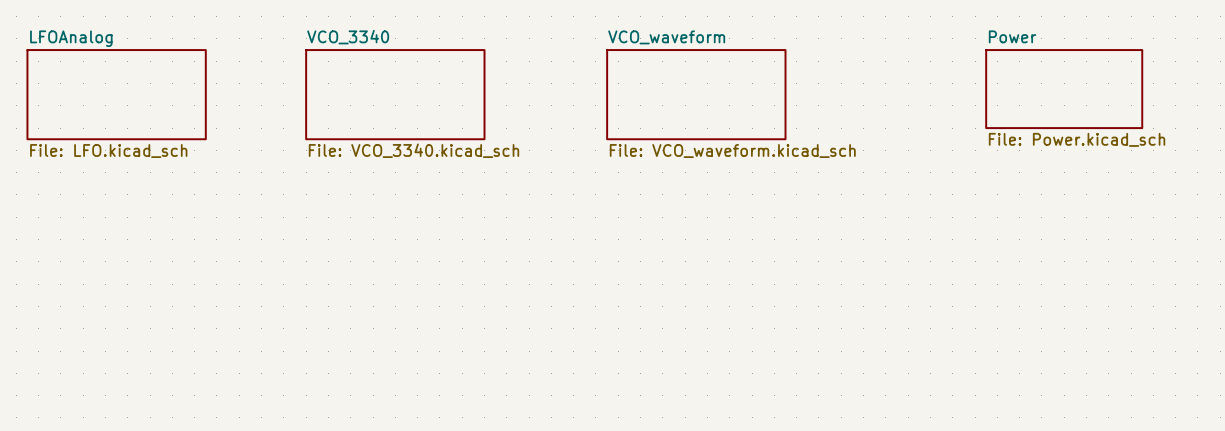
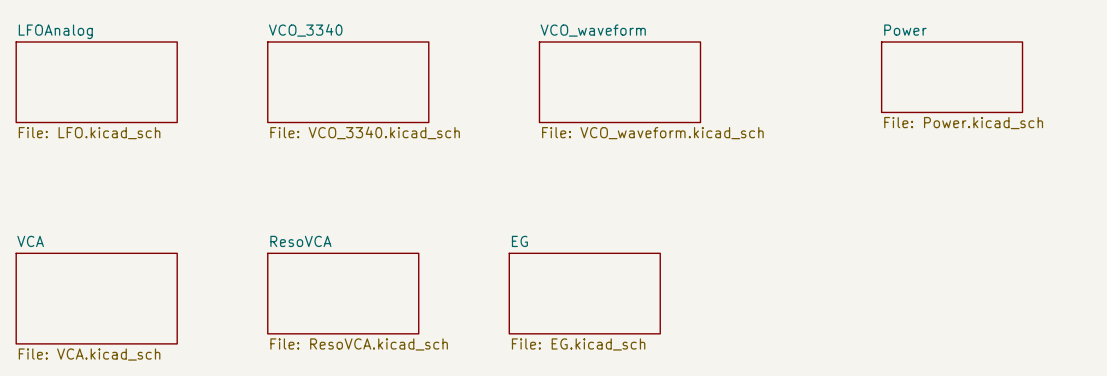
sheet ResoVCA: none -> File: ResoVCA.kicad_sch (343, 293)
sheet EG: none -> File: EG.kicad_sch (584, 293)
sheet VCA: none -> File: VCA.kicad_sch (96, 298)

